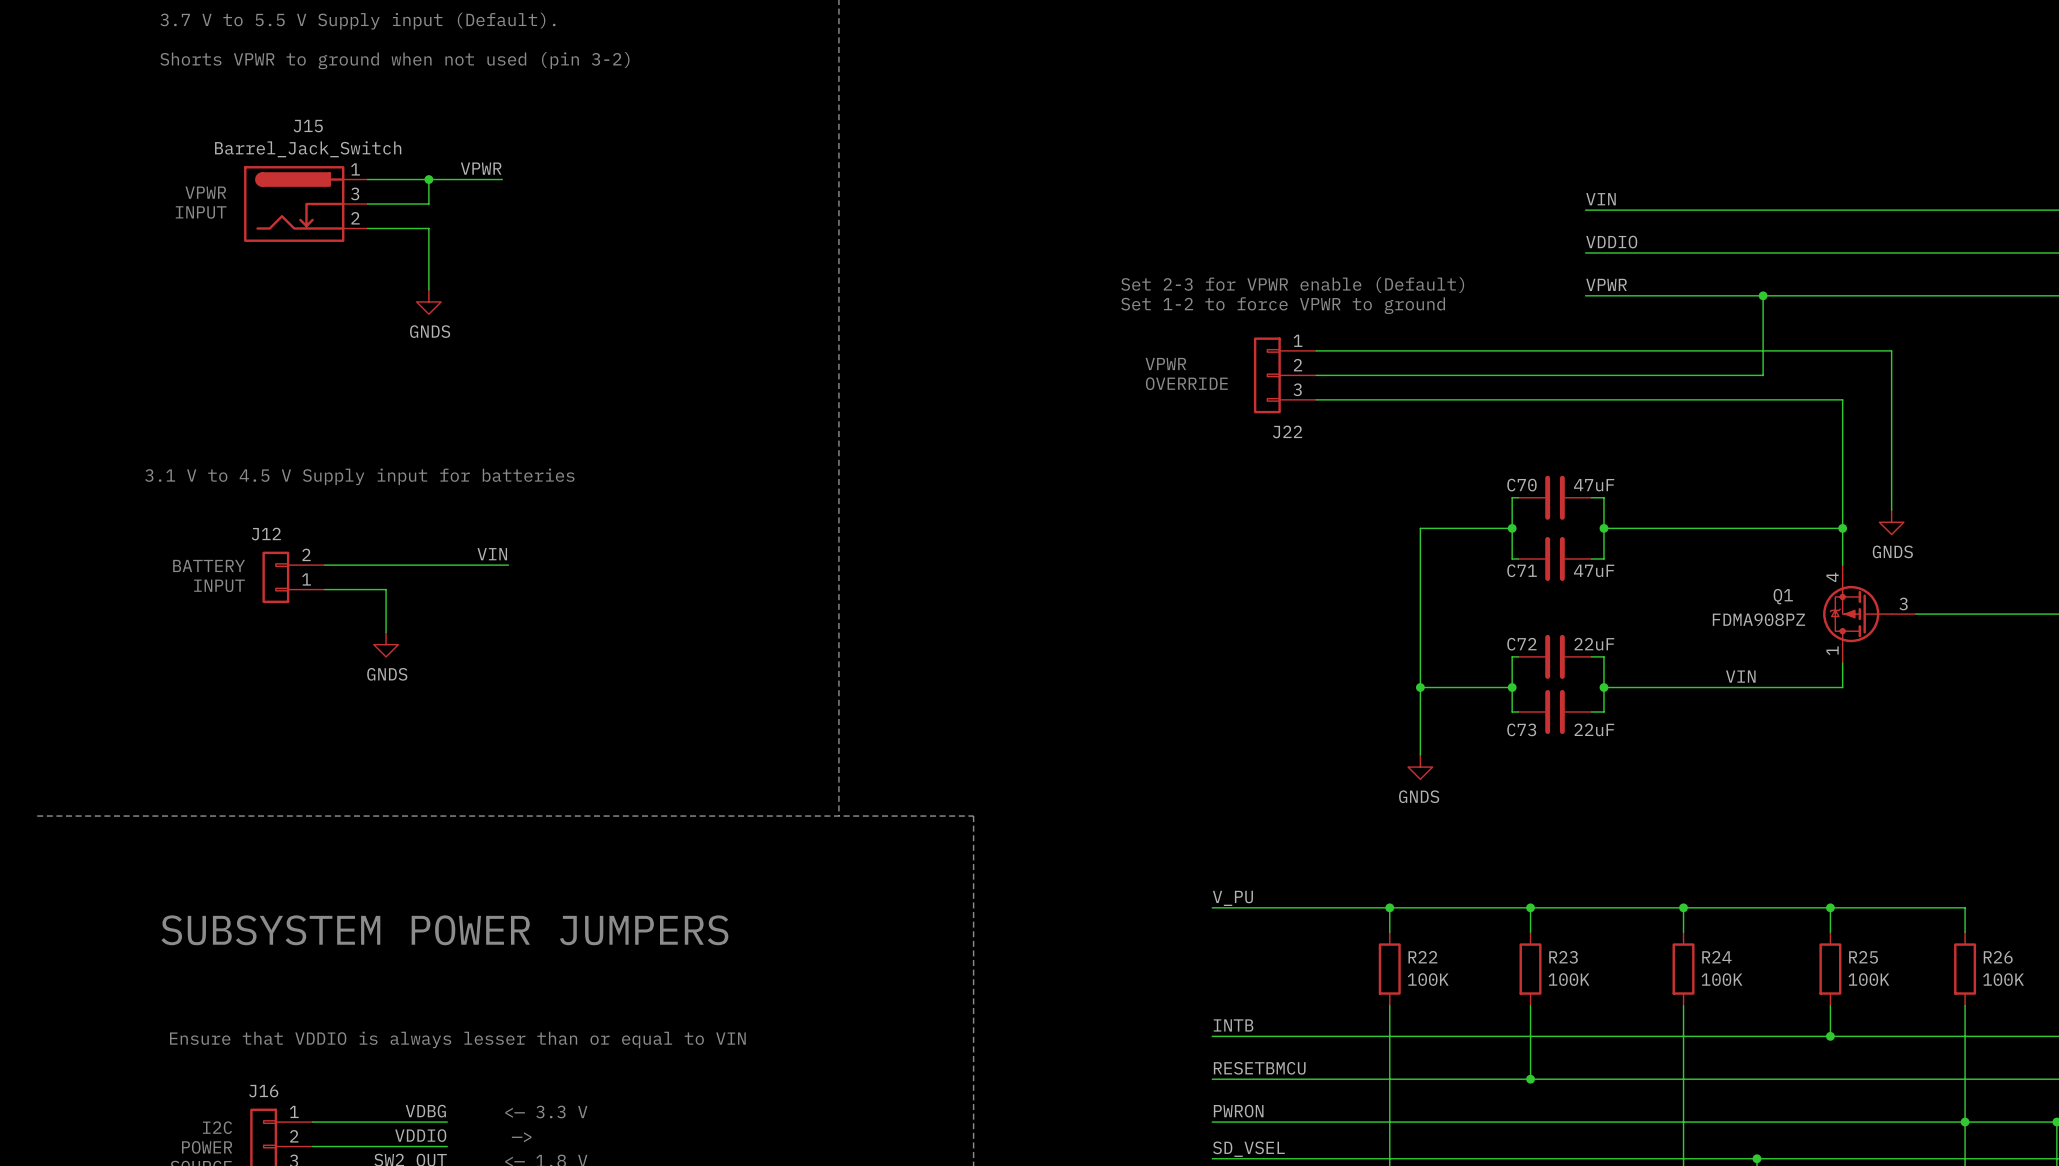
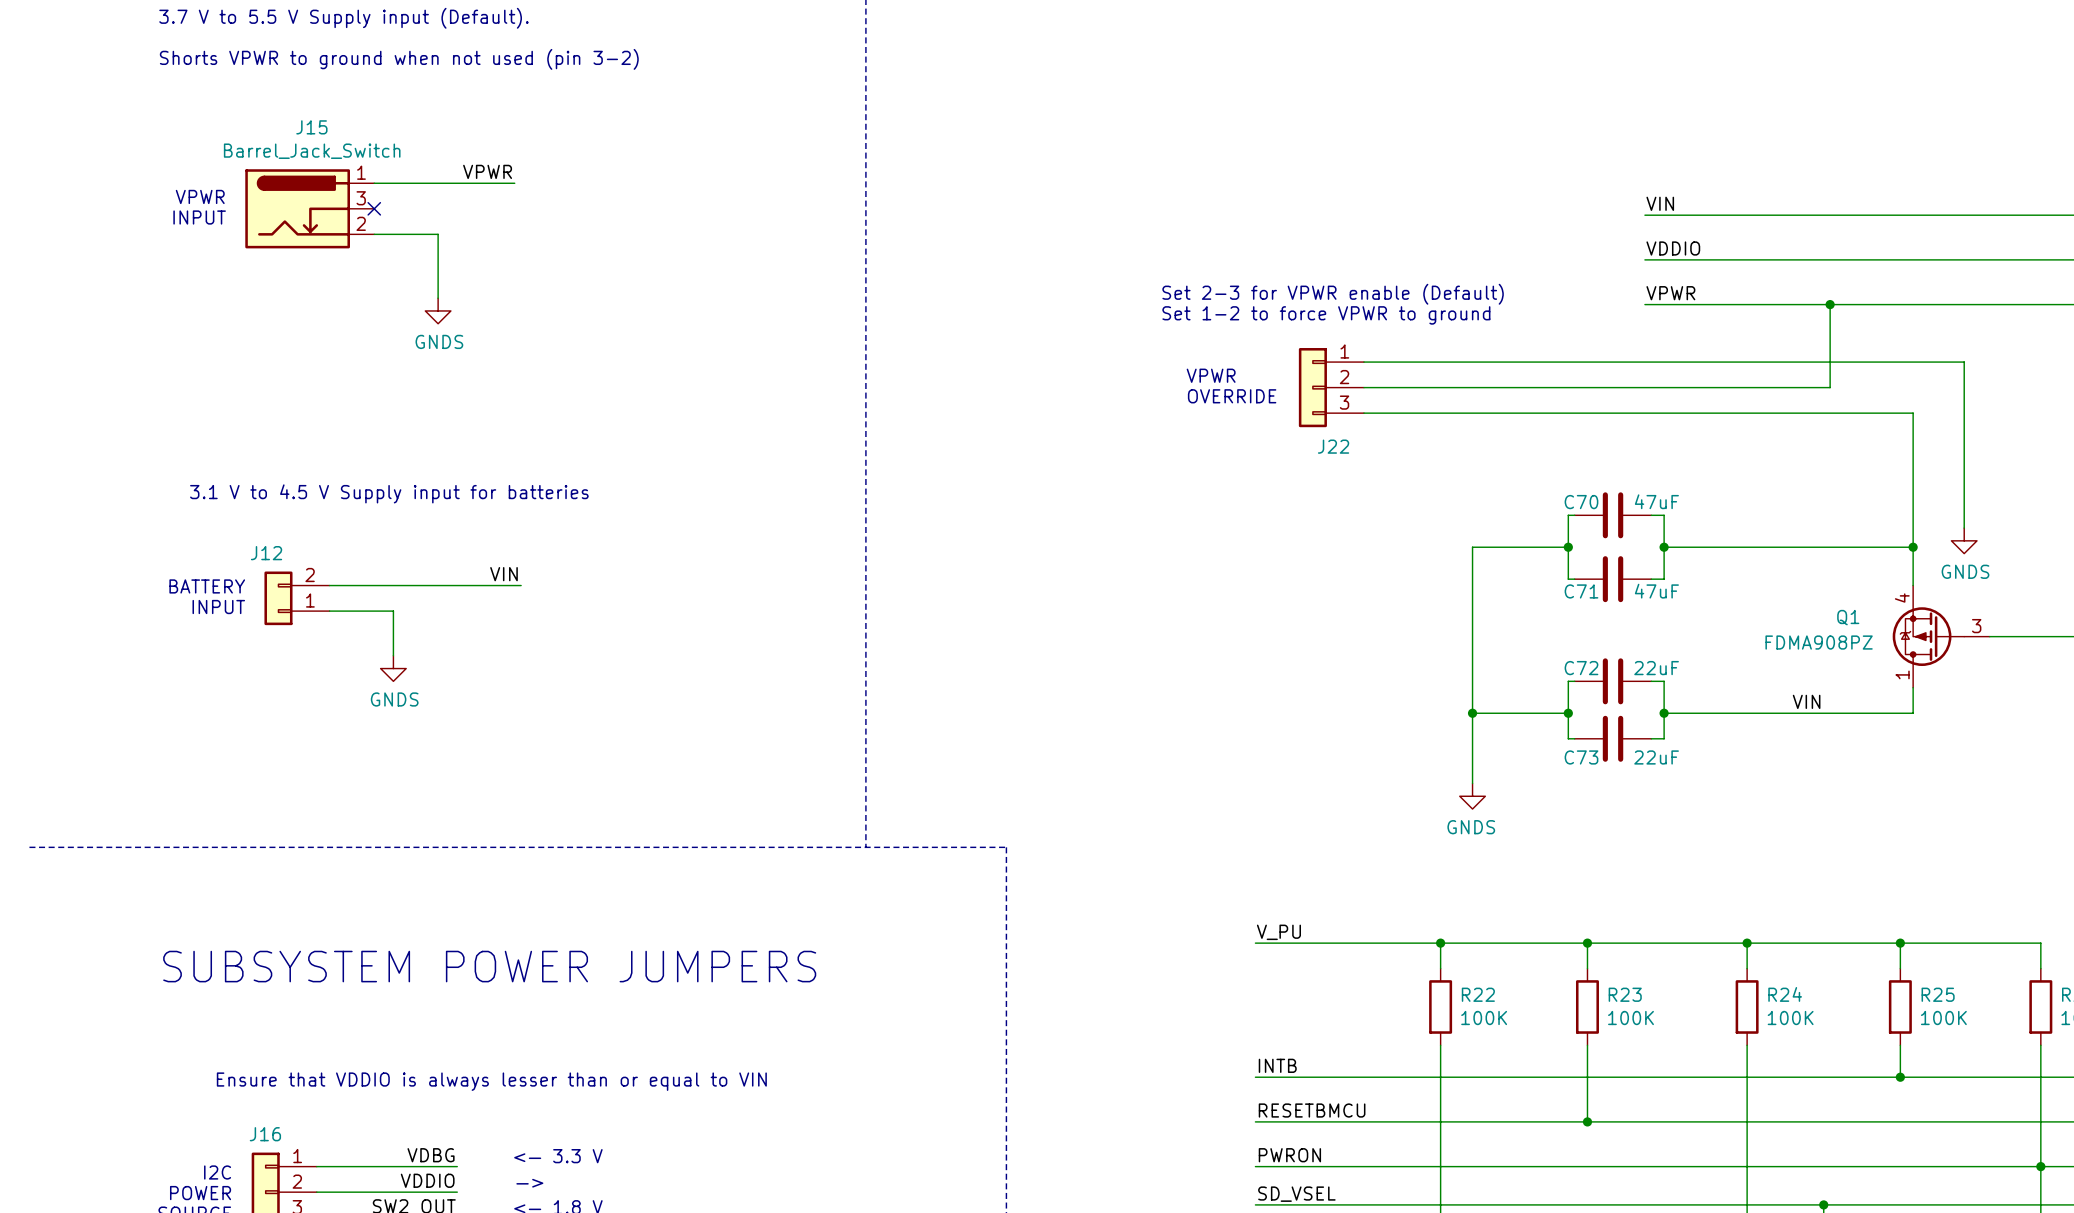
wire: (428, 179) (428, 204) (367, 204) -> none
junction: (428, 179) -> none
no-connect mark: none -> (374, 208)

